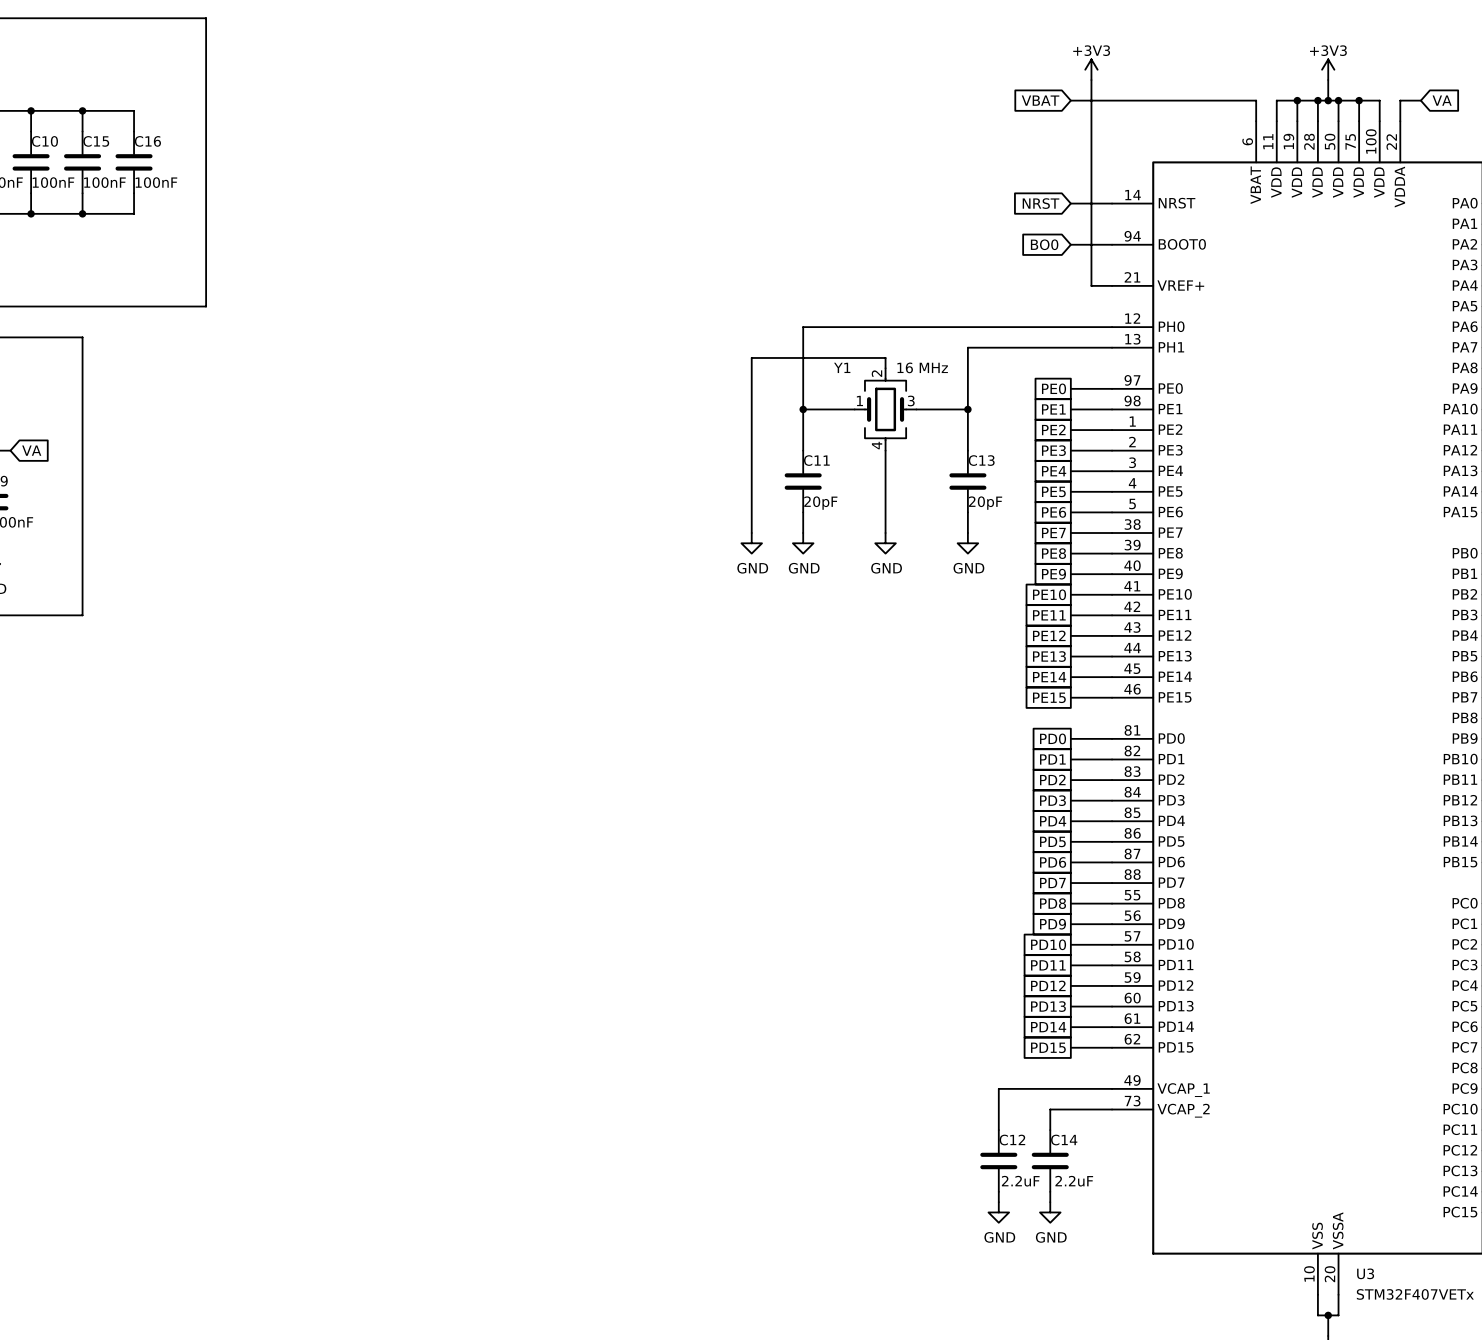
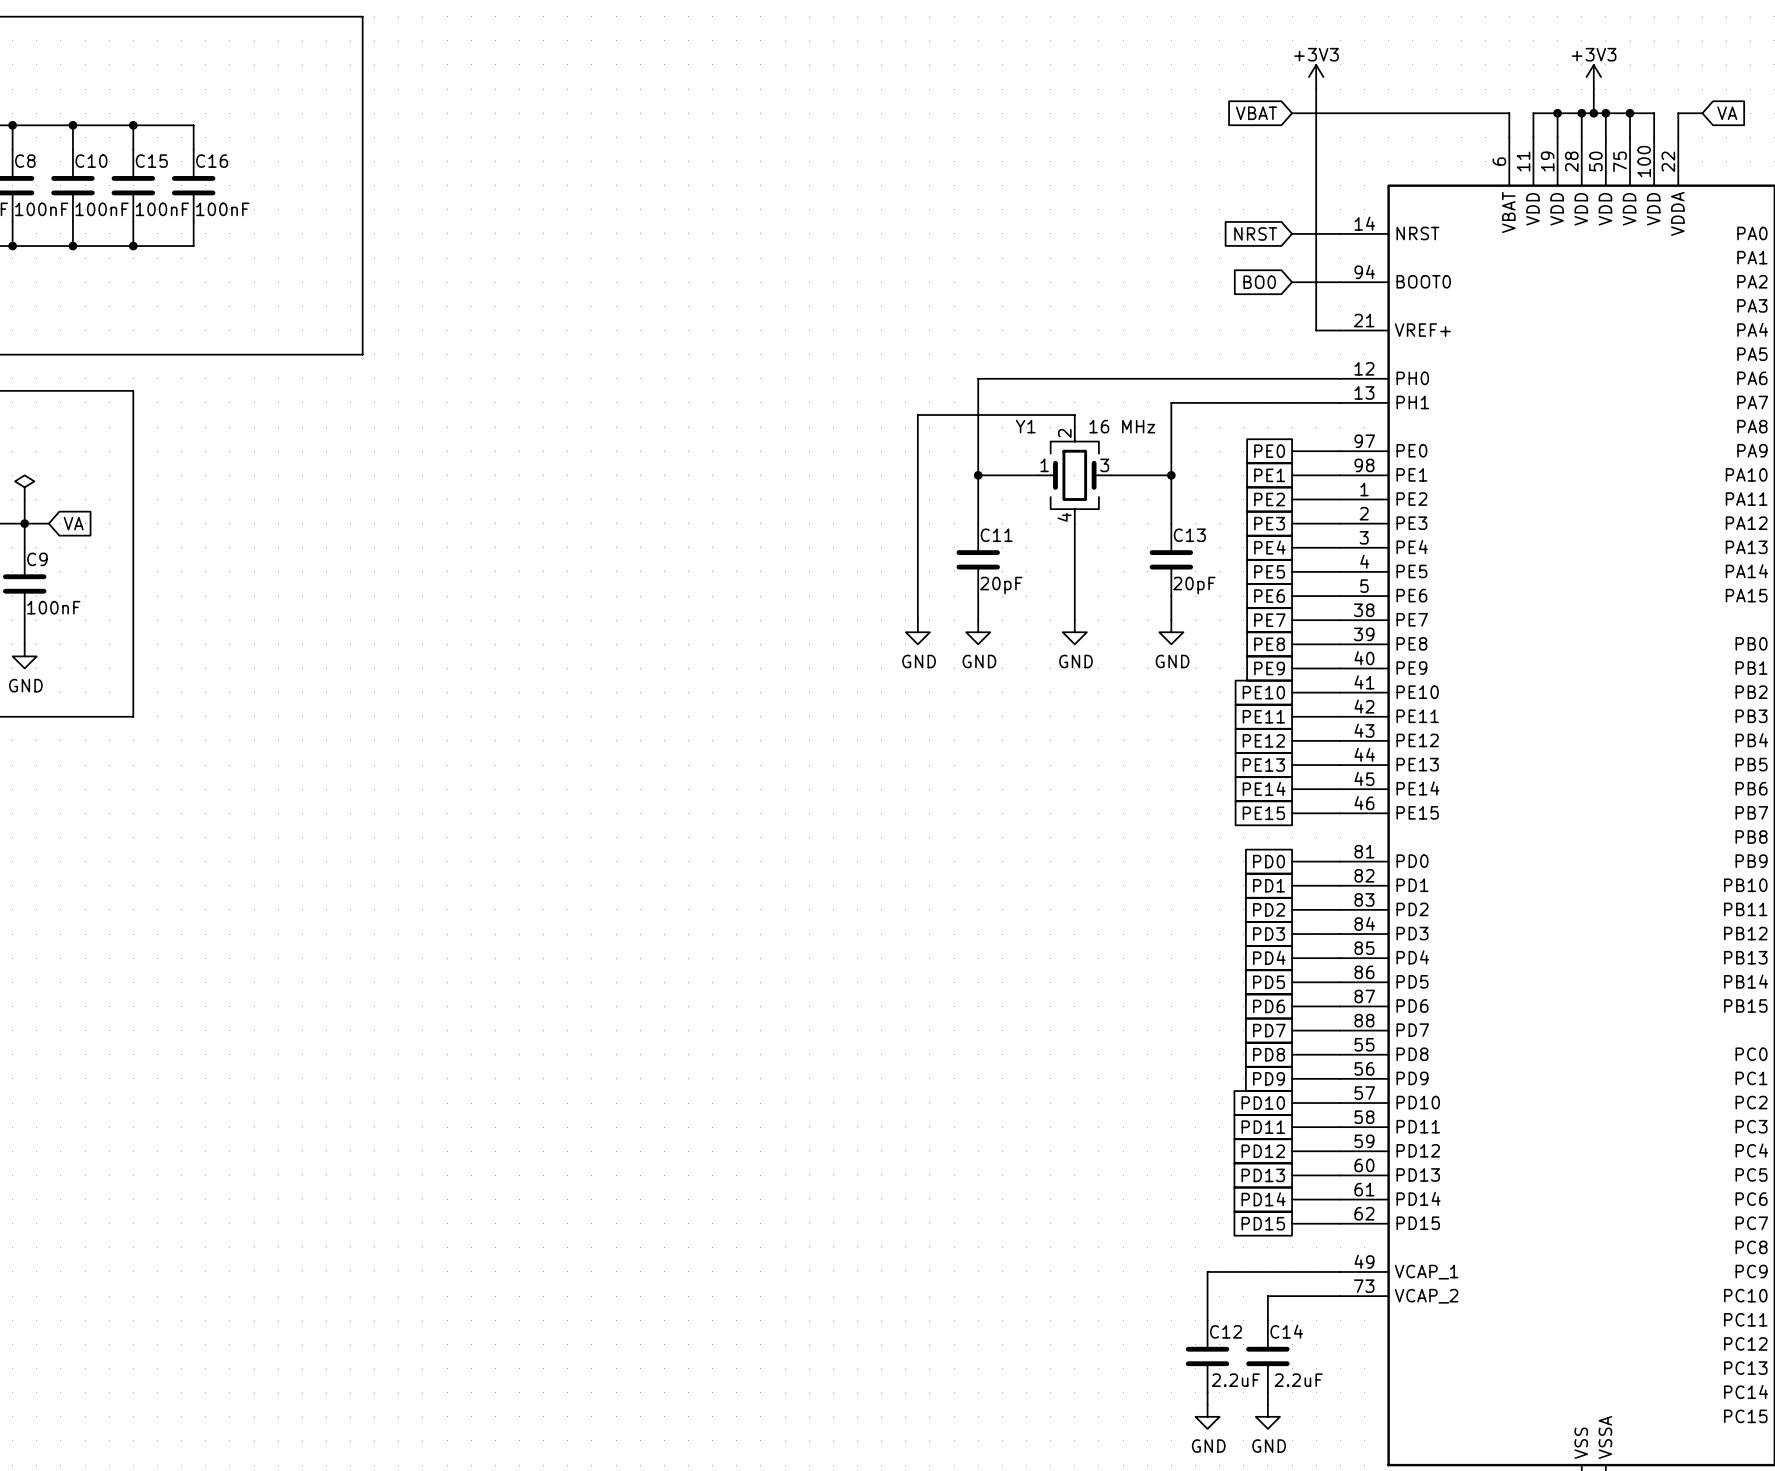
line: (206, 18) (206, 306) -> (278, 16) (362, 16) (362, 354) (278, 354)

